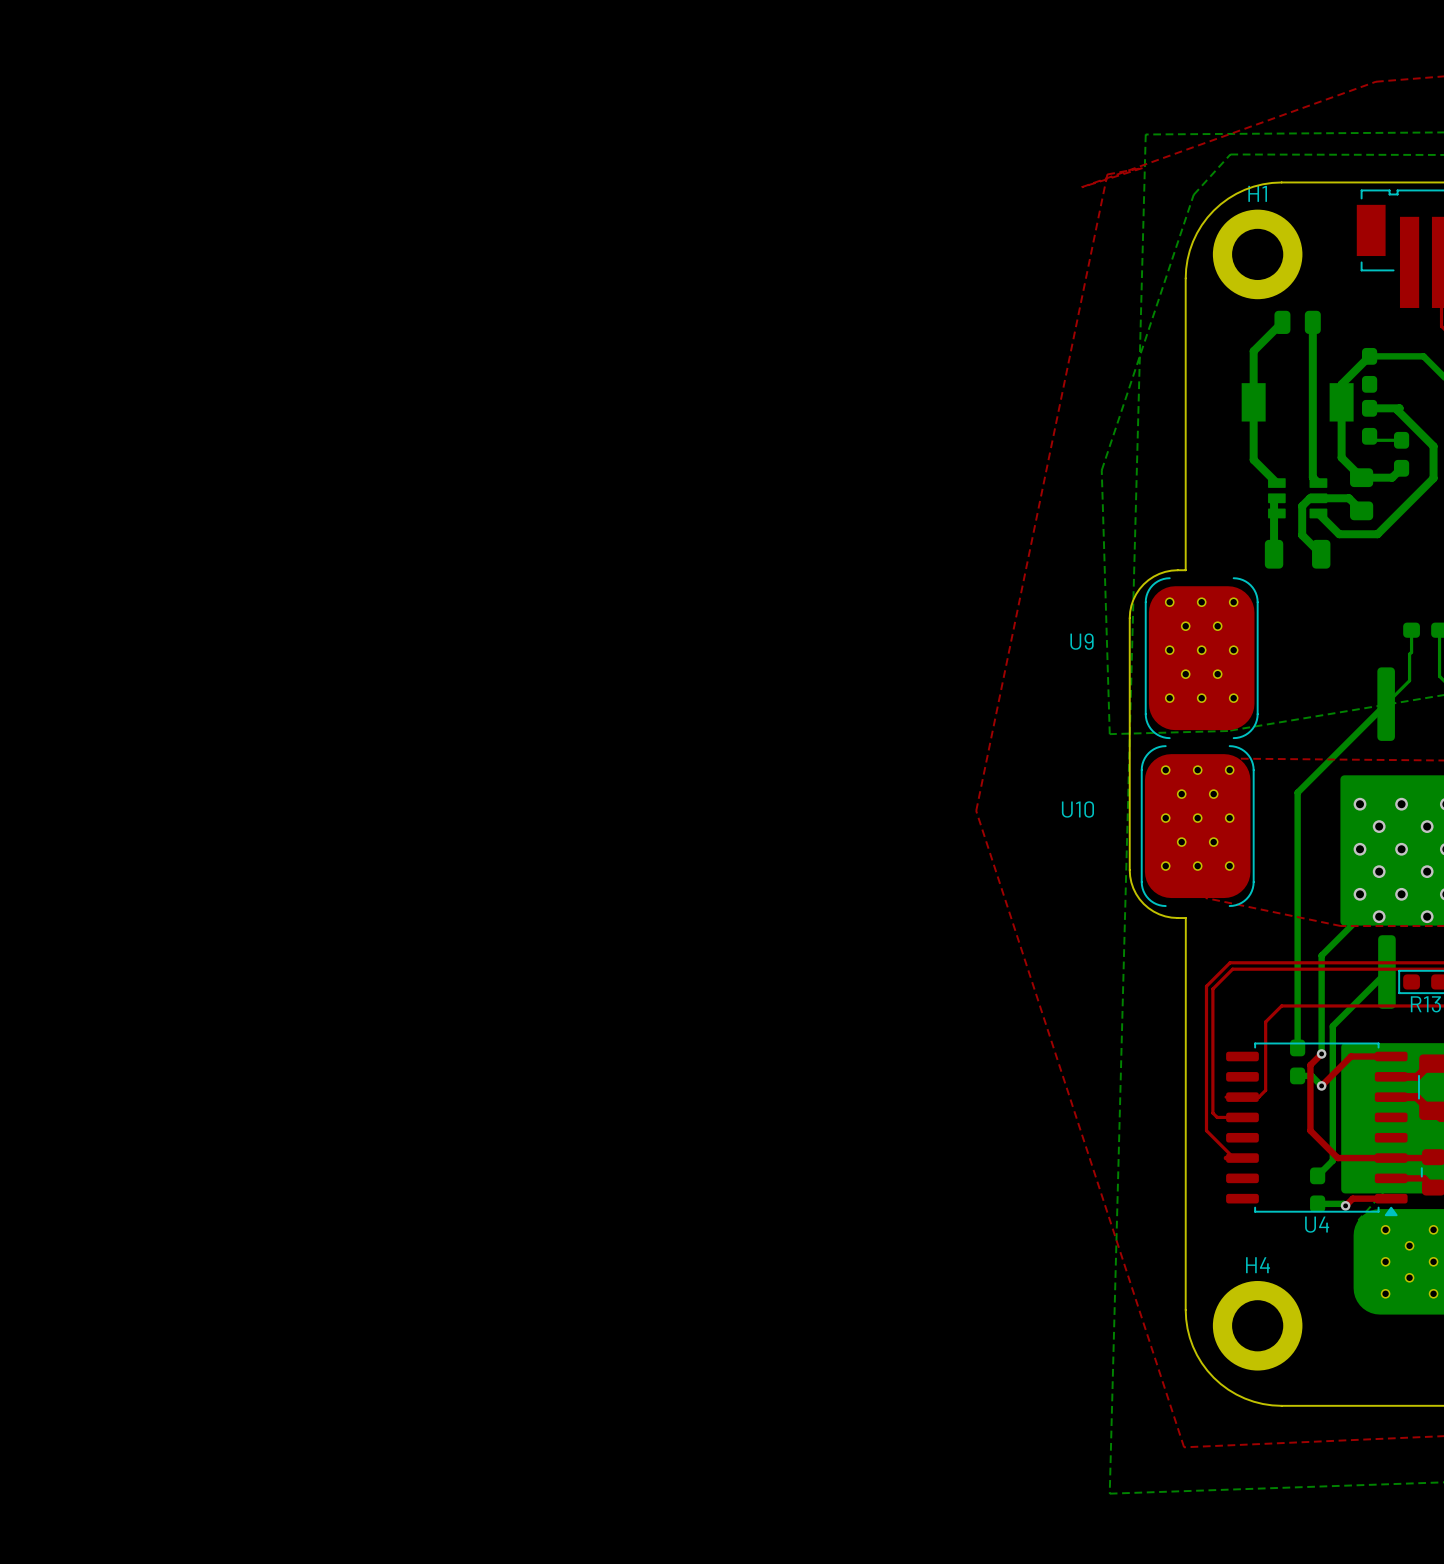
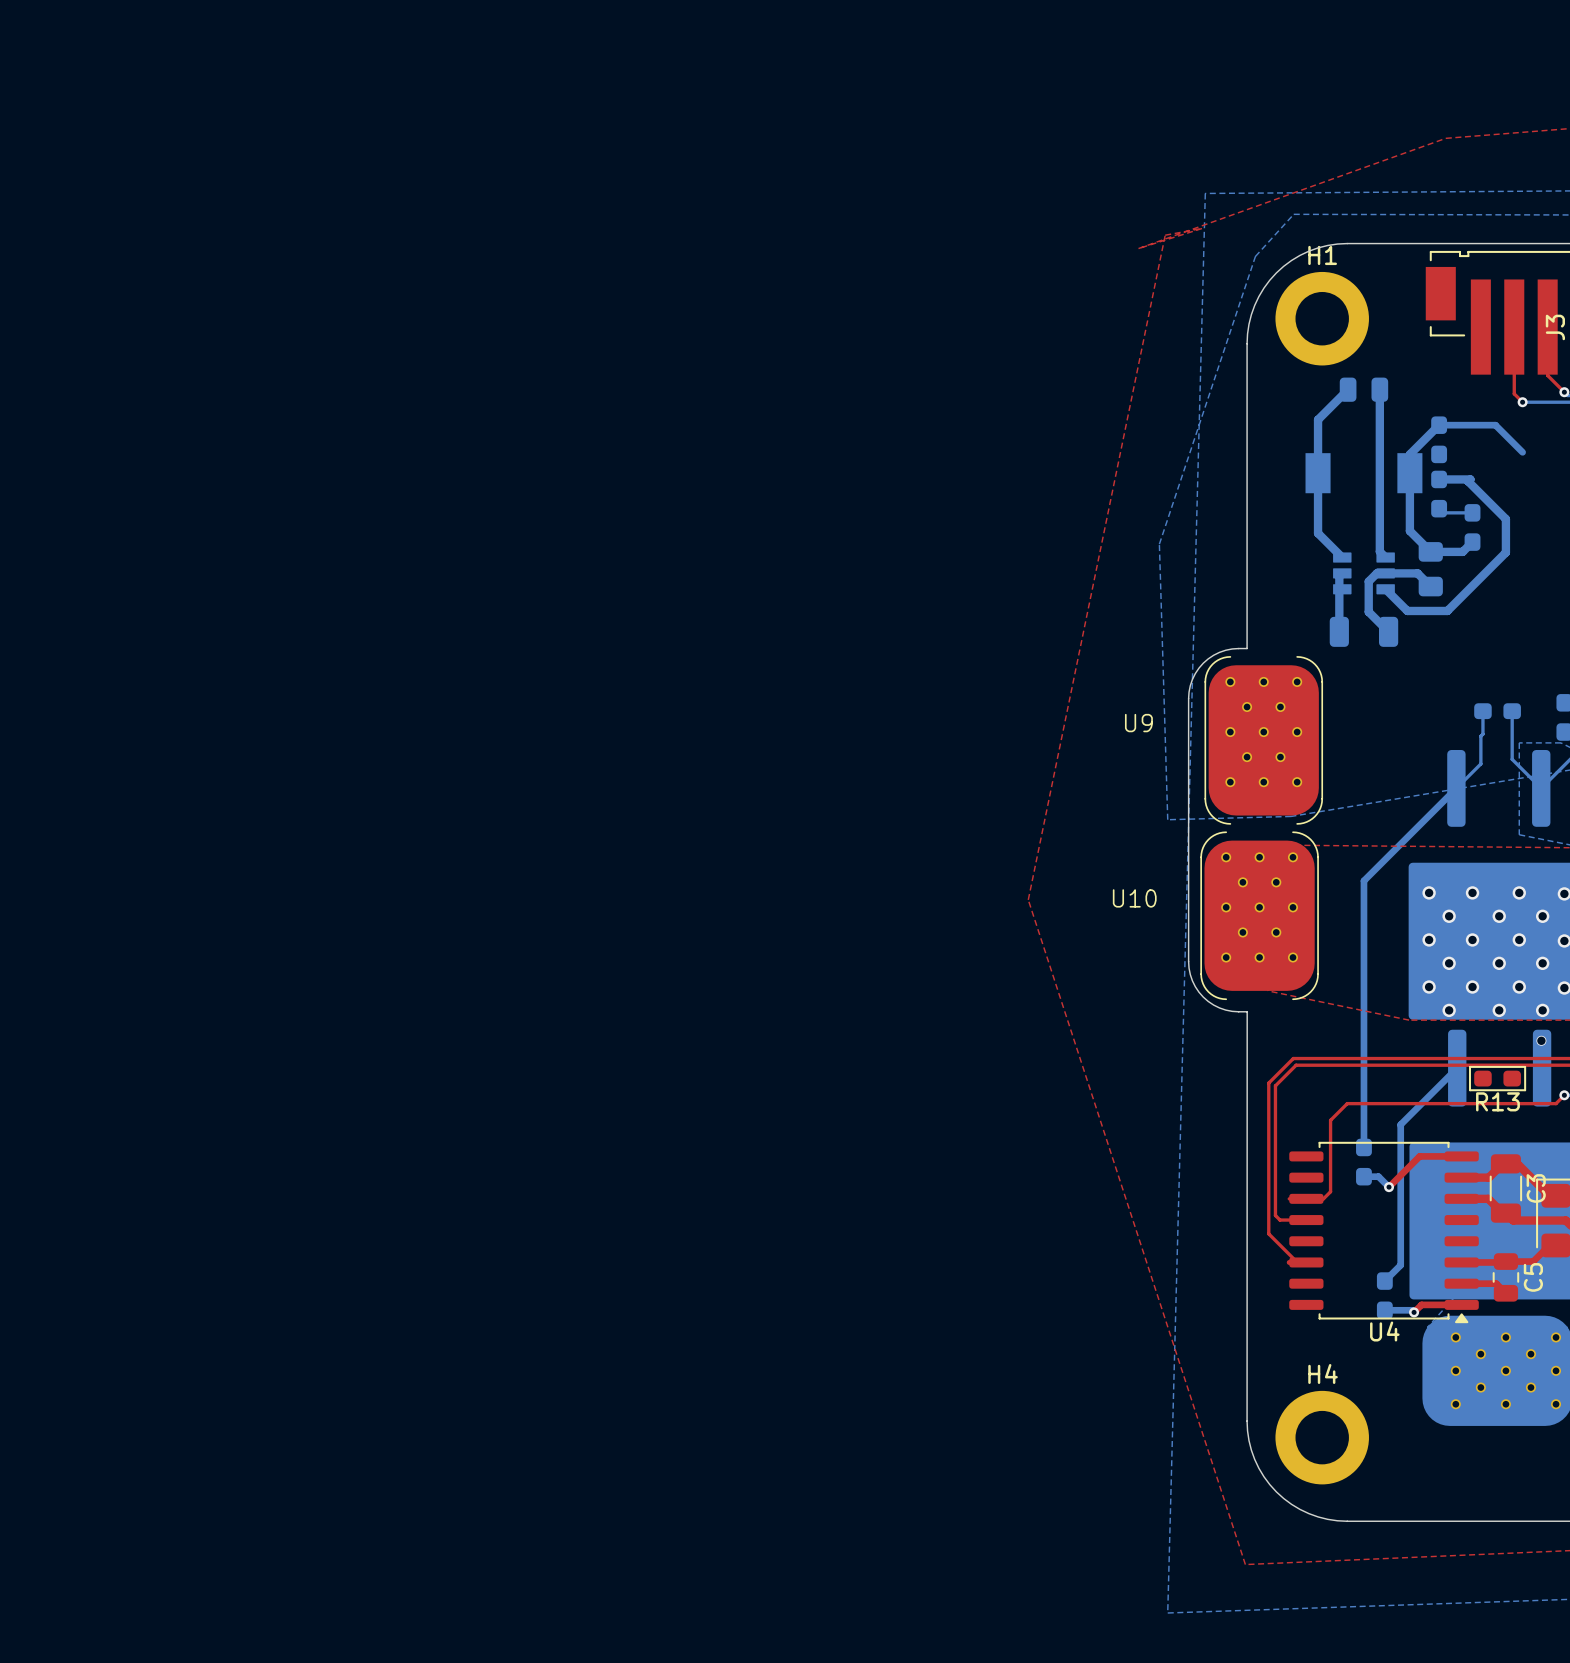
bottom track: (1426, 850) (1321, 955) (1321, 1053) -> none
top track: (1321, 1053) (1310, 1065) (1310, 1130) (1337, 1158) (1391, 1158) -> none
via: (1321, 1053) -> none

